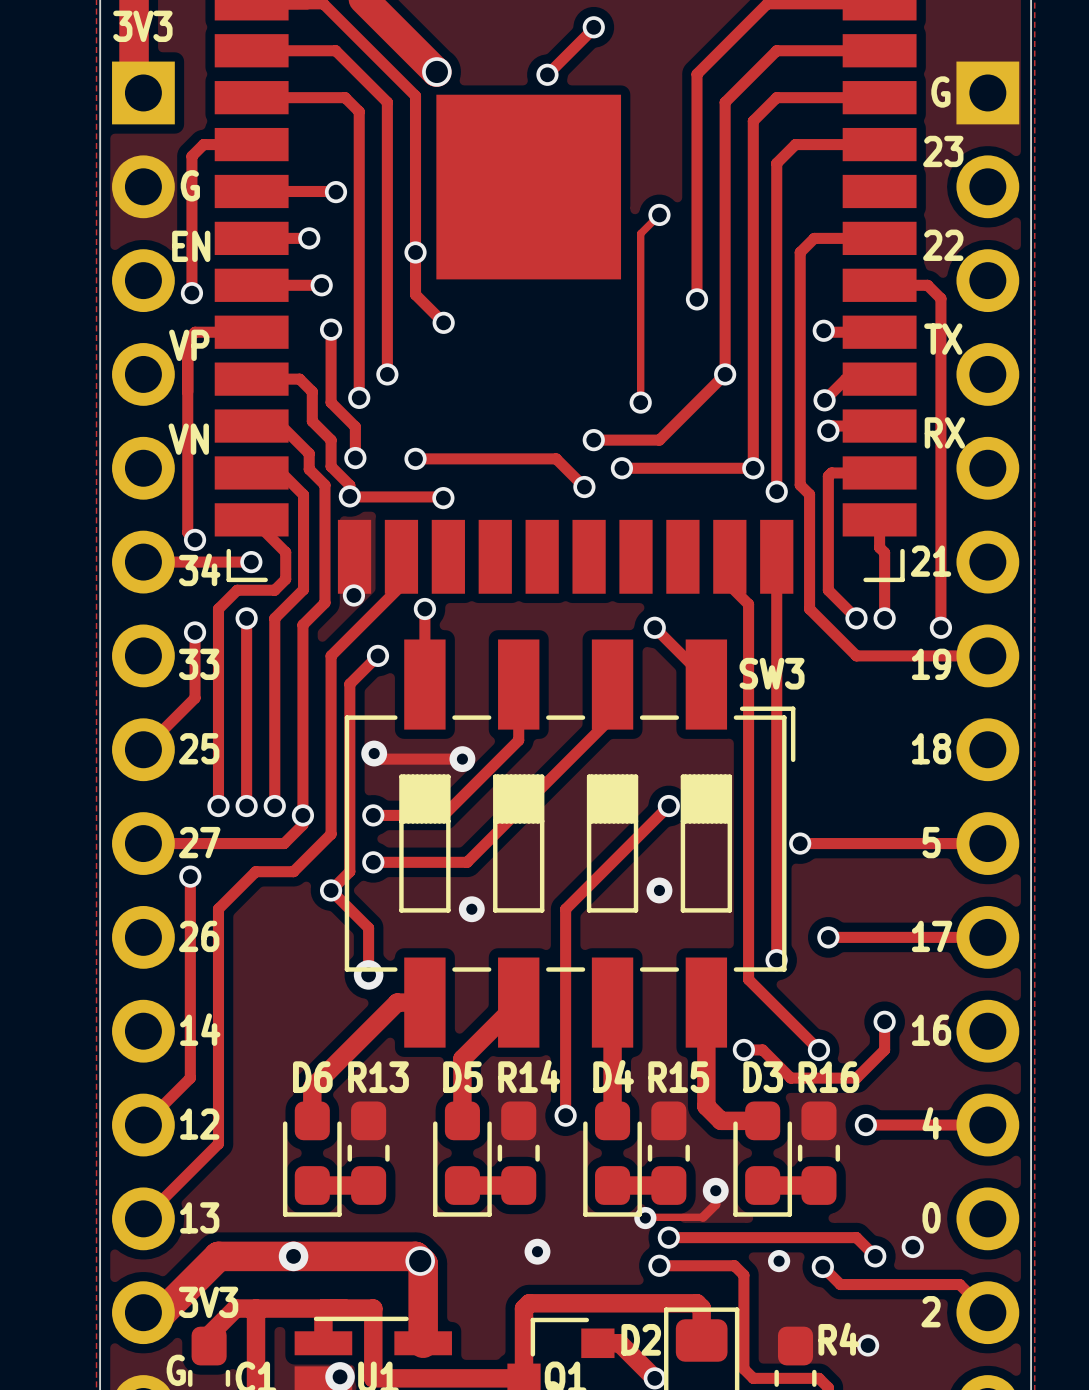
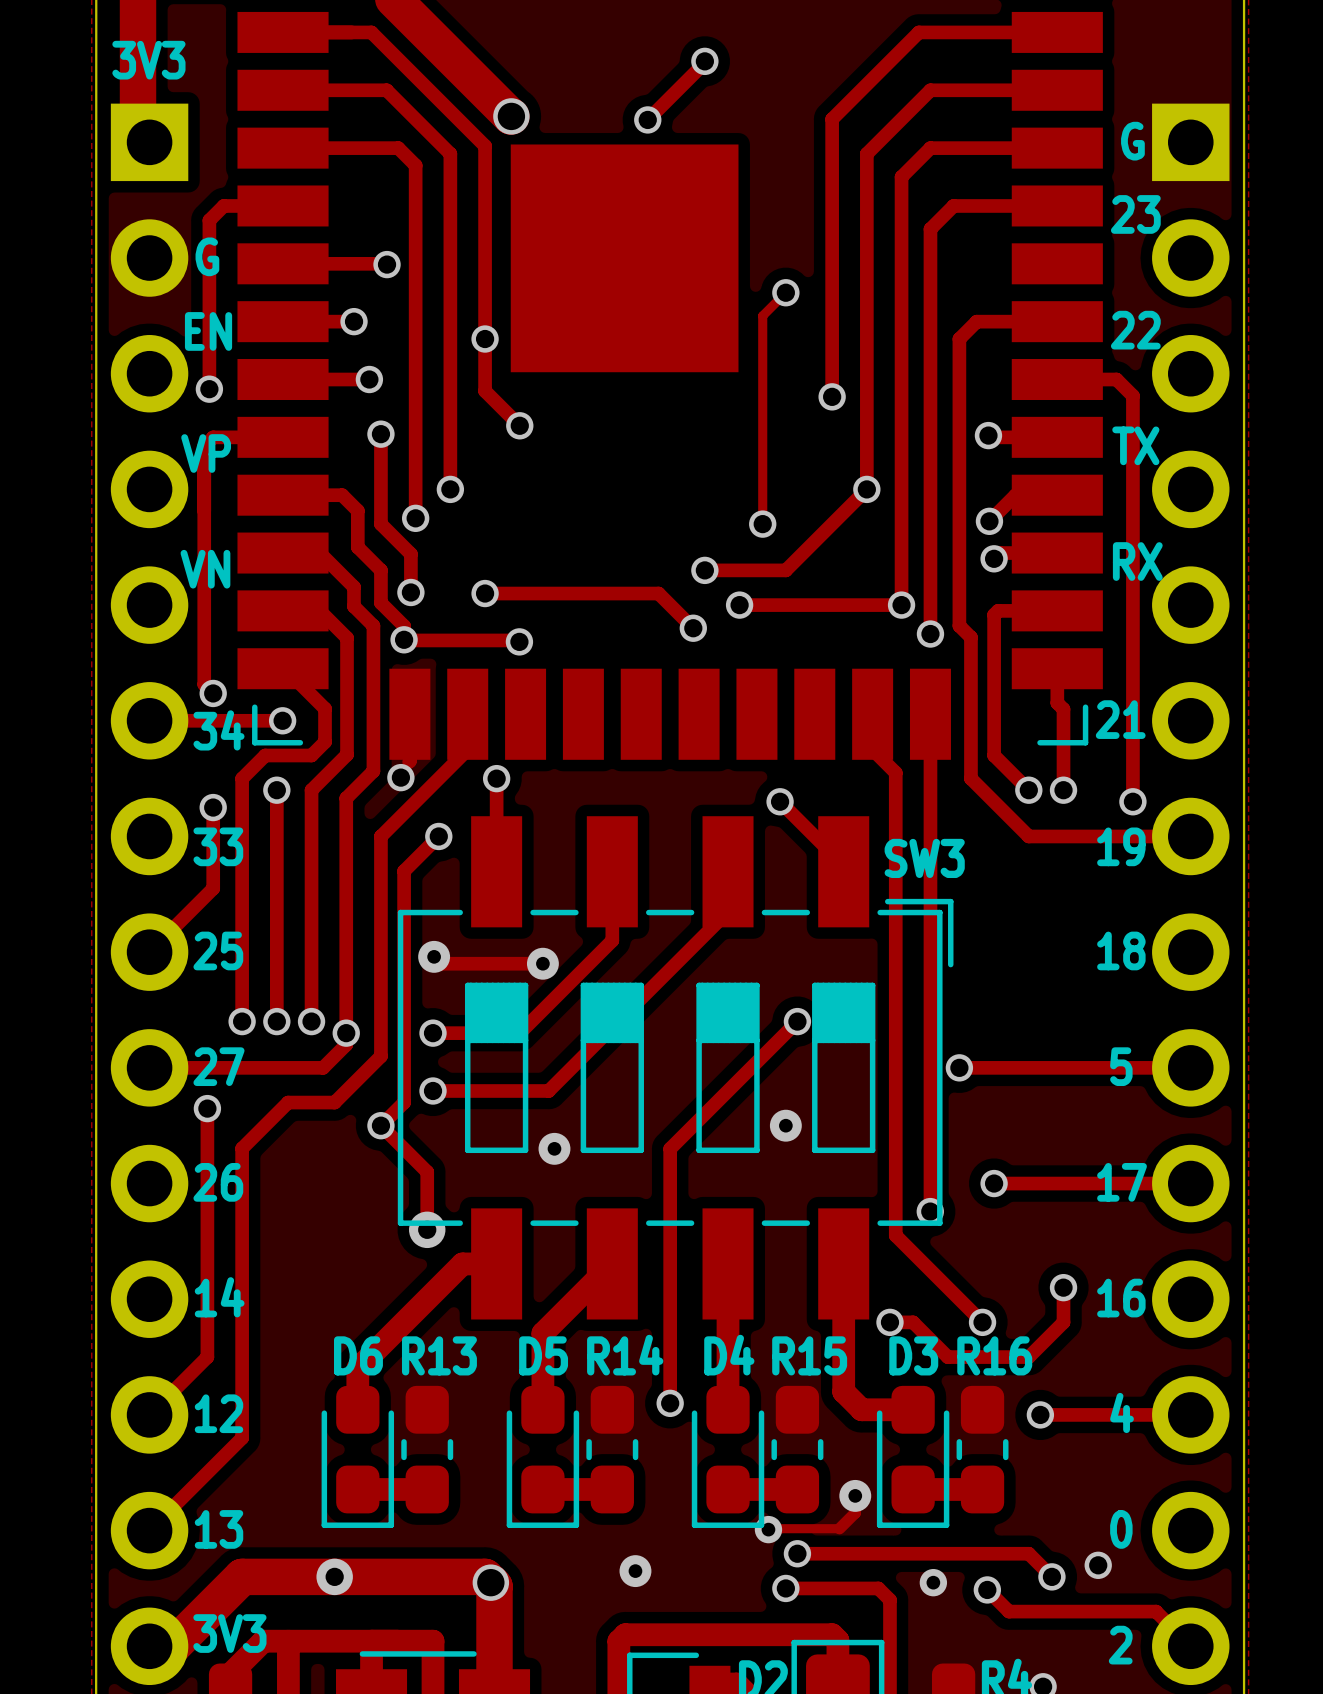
via position: (353, 595) -> (400, 777)

